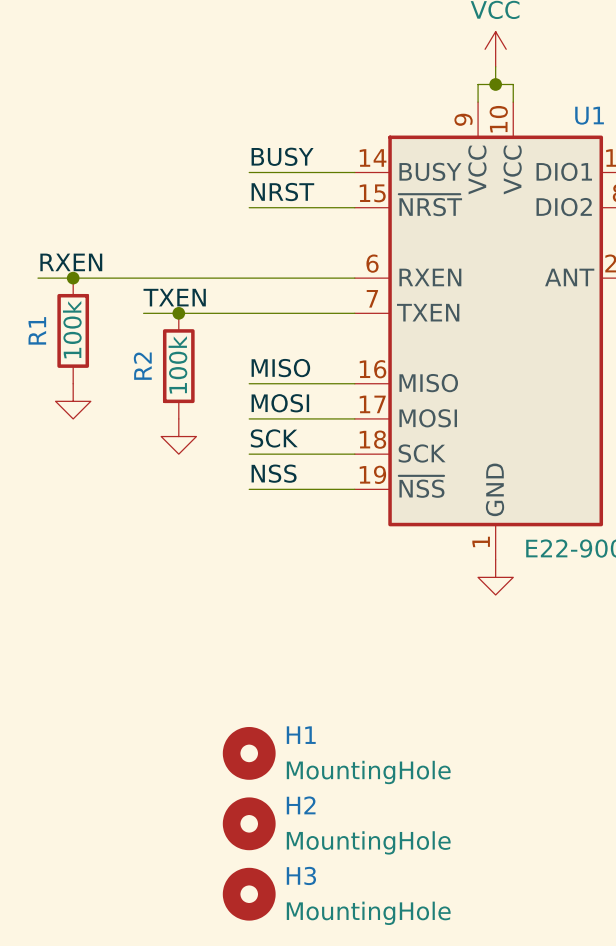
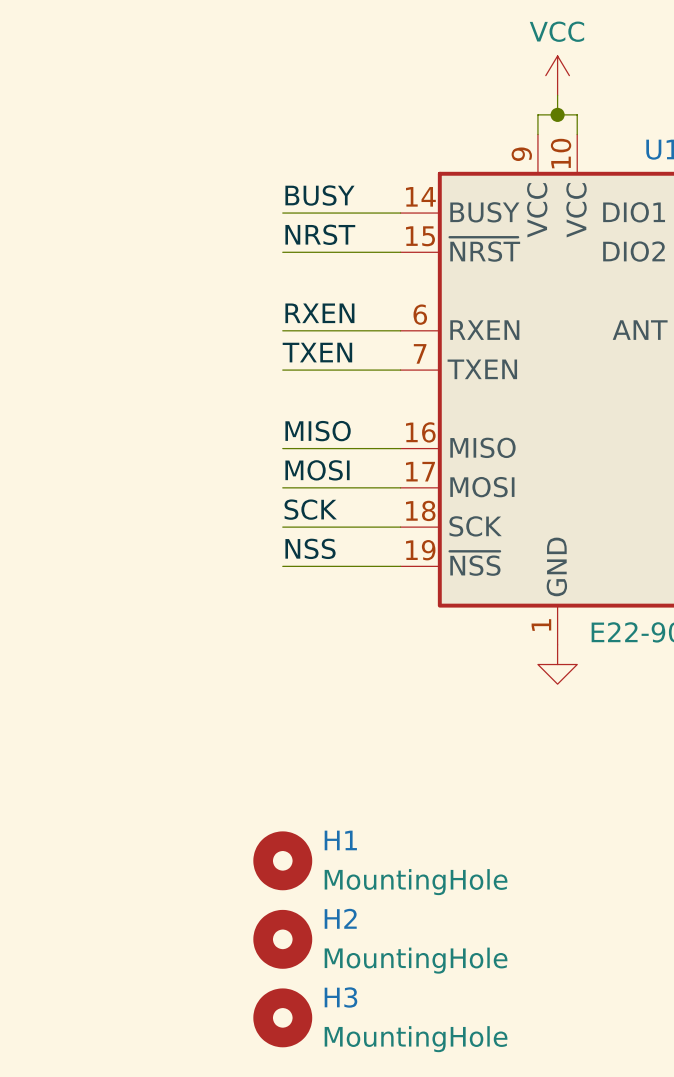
label position: RXEN (71, 262) -> RXEN (319, 313)
wire: (37, 278) (249, 278) -> none
junction: (73, 278) -> none
label position: TXEN (174, 297) -> TXEN (317, 352)
wire: (143, 313) (249, 313) -> none
junction: (178, 313) -> none
R1: 100k (73, 330) -> none
R2: 100k (178, 366) -> none
power symbol: (73, 401) -> none
power symbol: (178, 436) -> none

